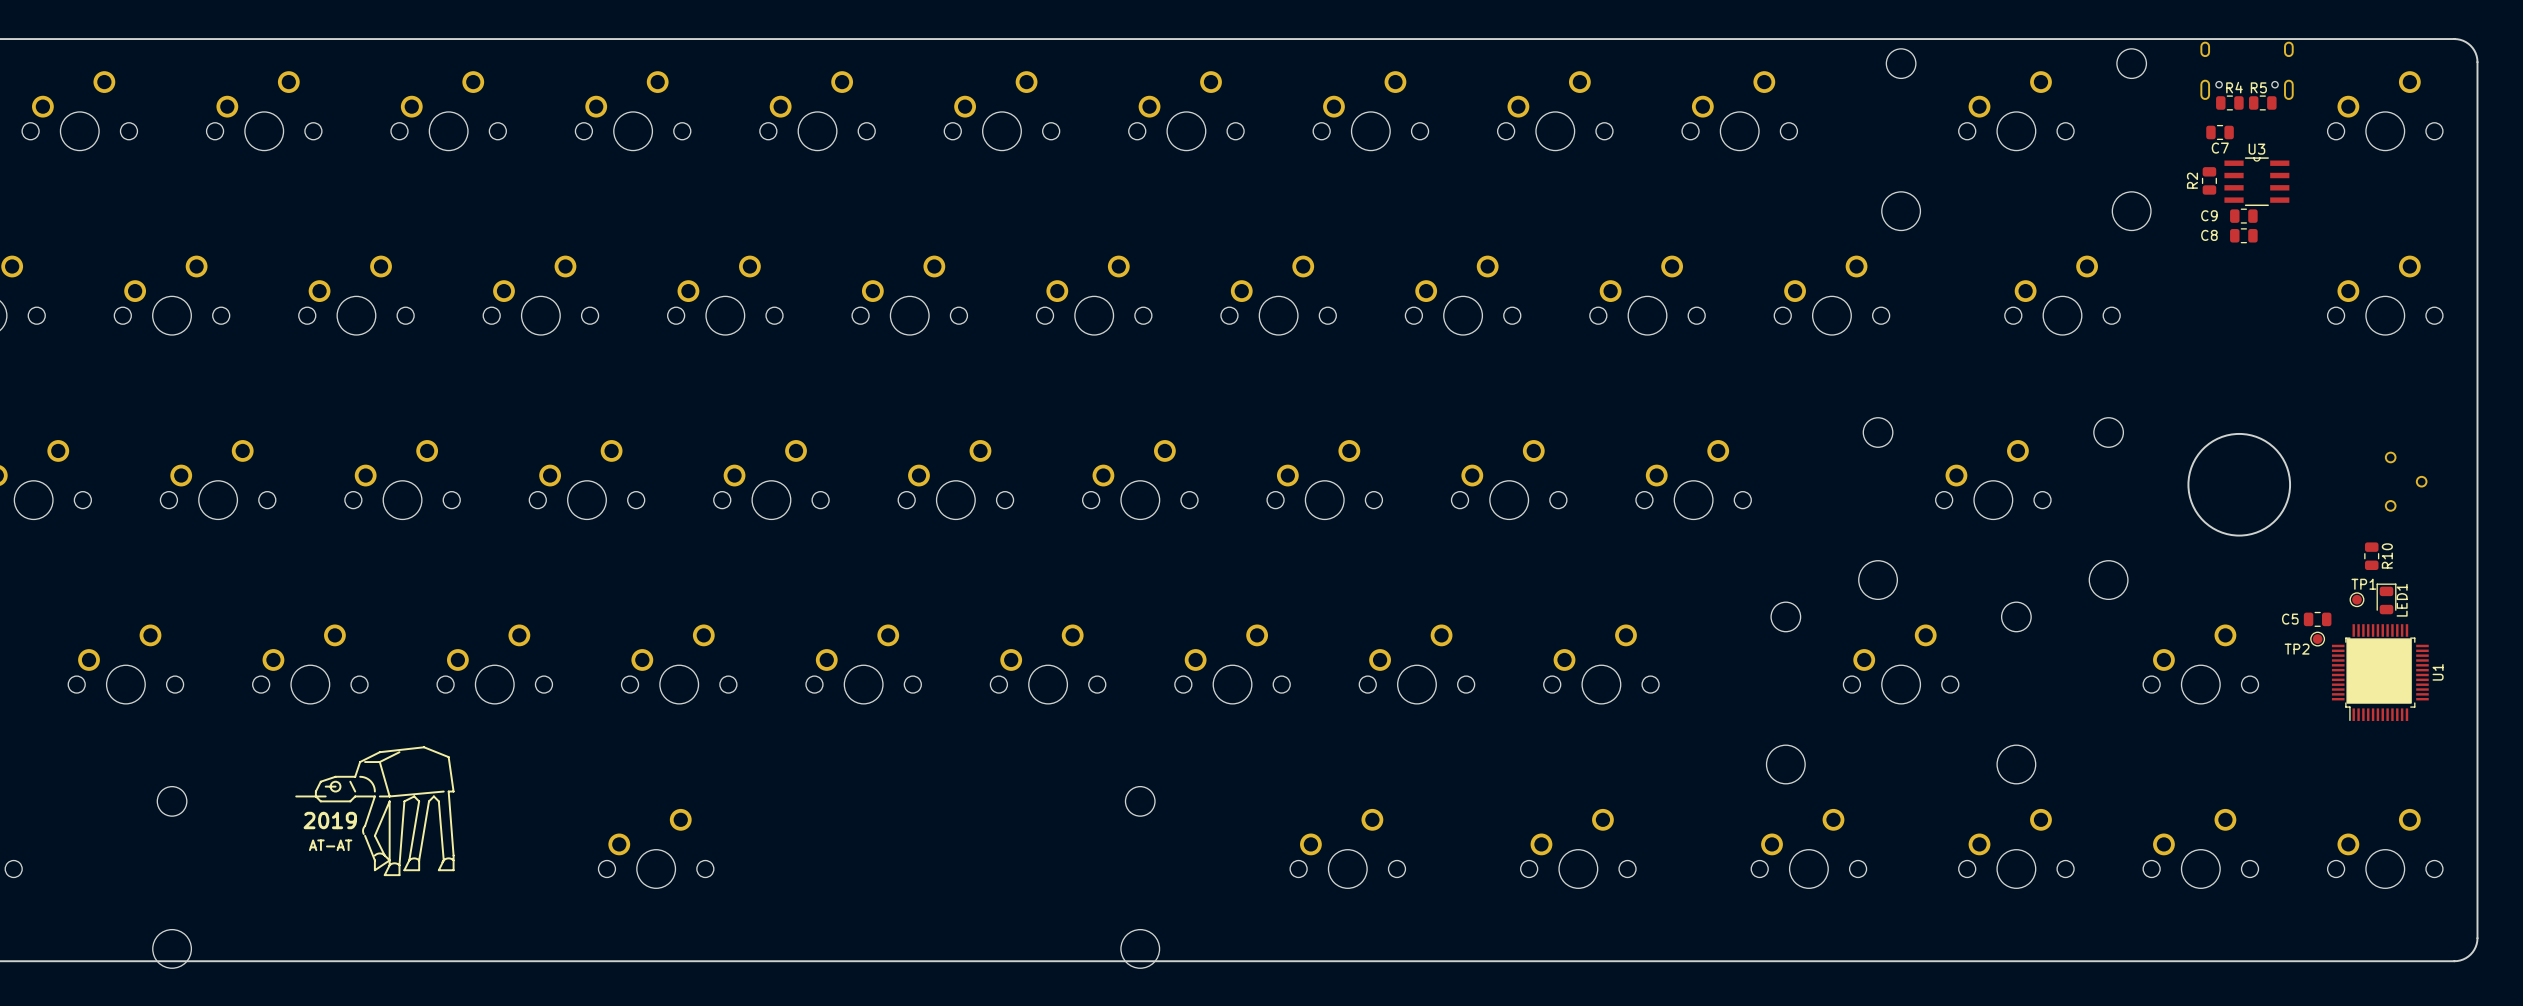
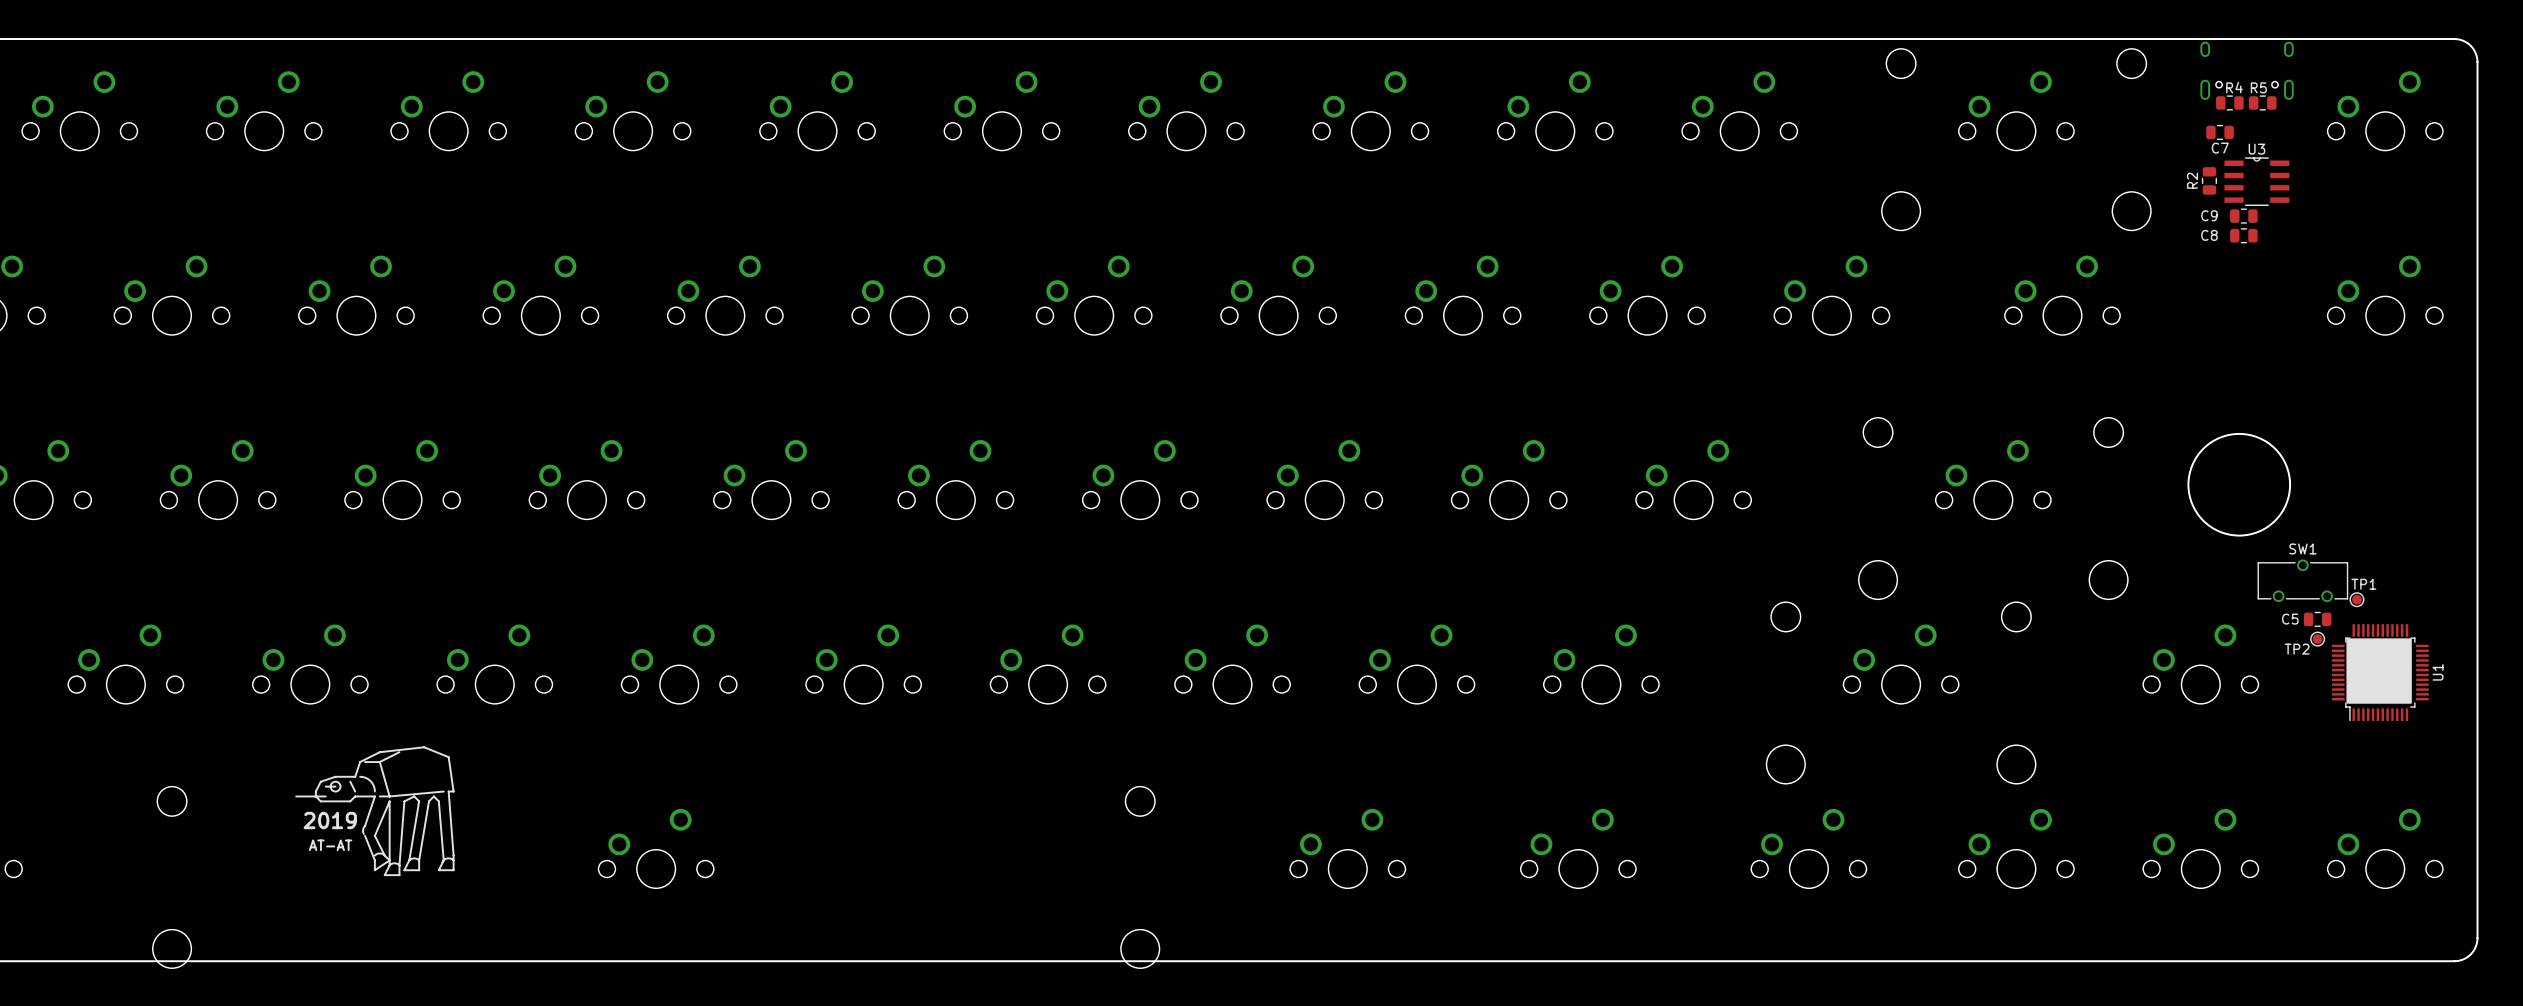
SW1 side: bottom (2406, 481) -> top (2302, 580)
R10: (2371, 556) -> none
LED1: (2386, 598) -> none

